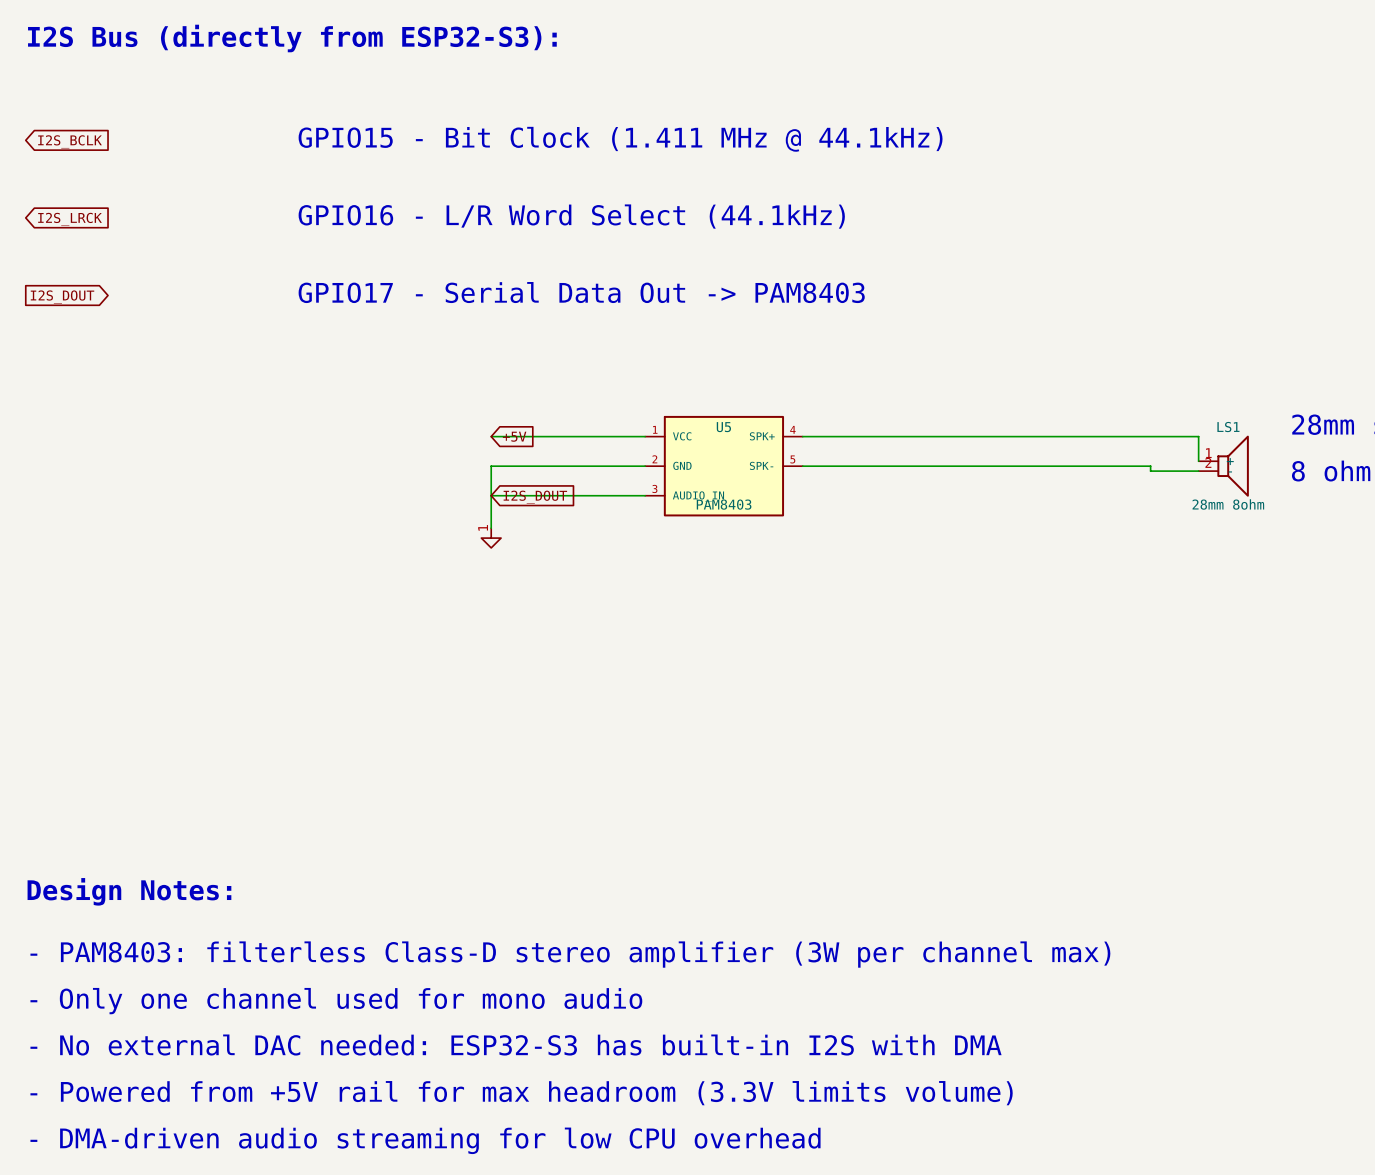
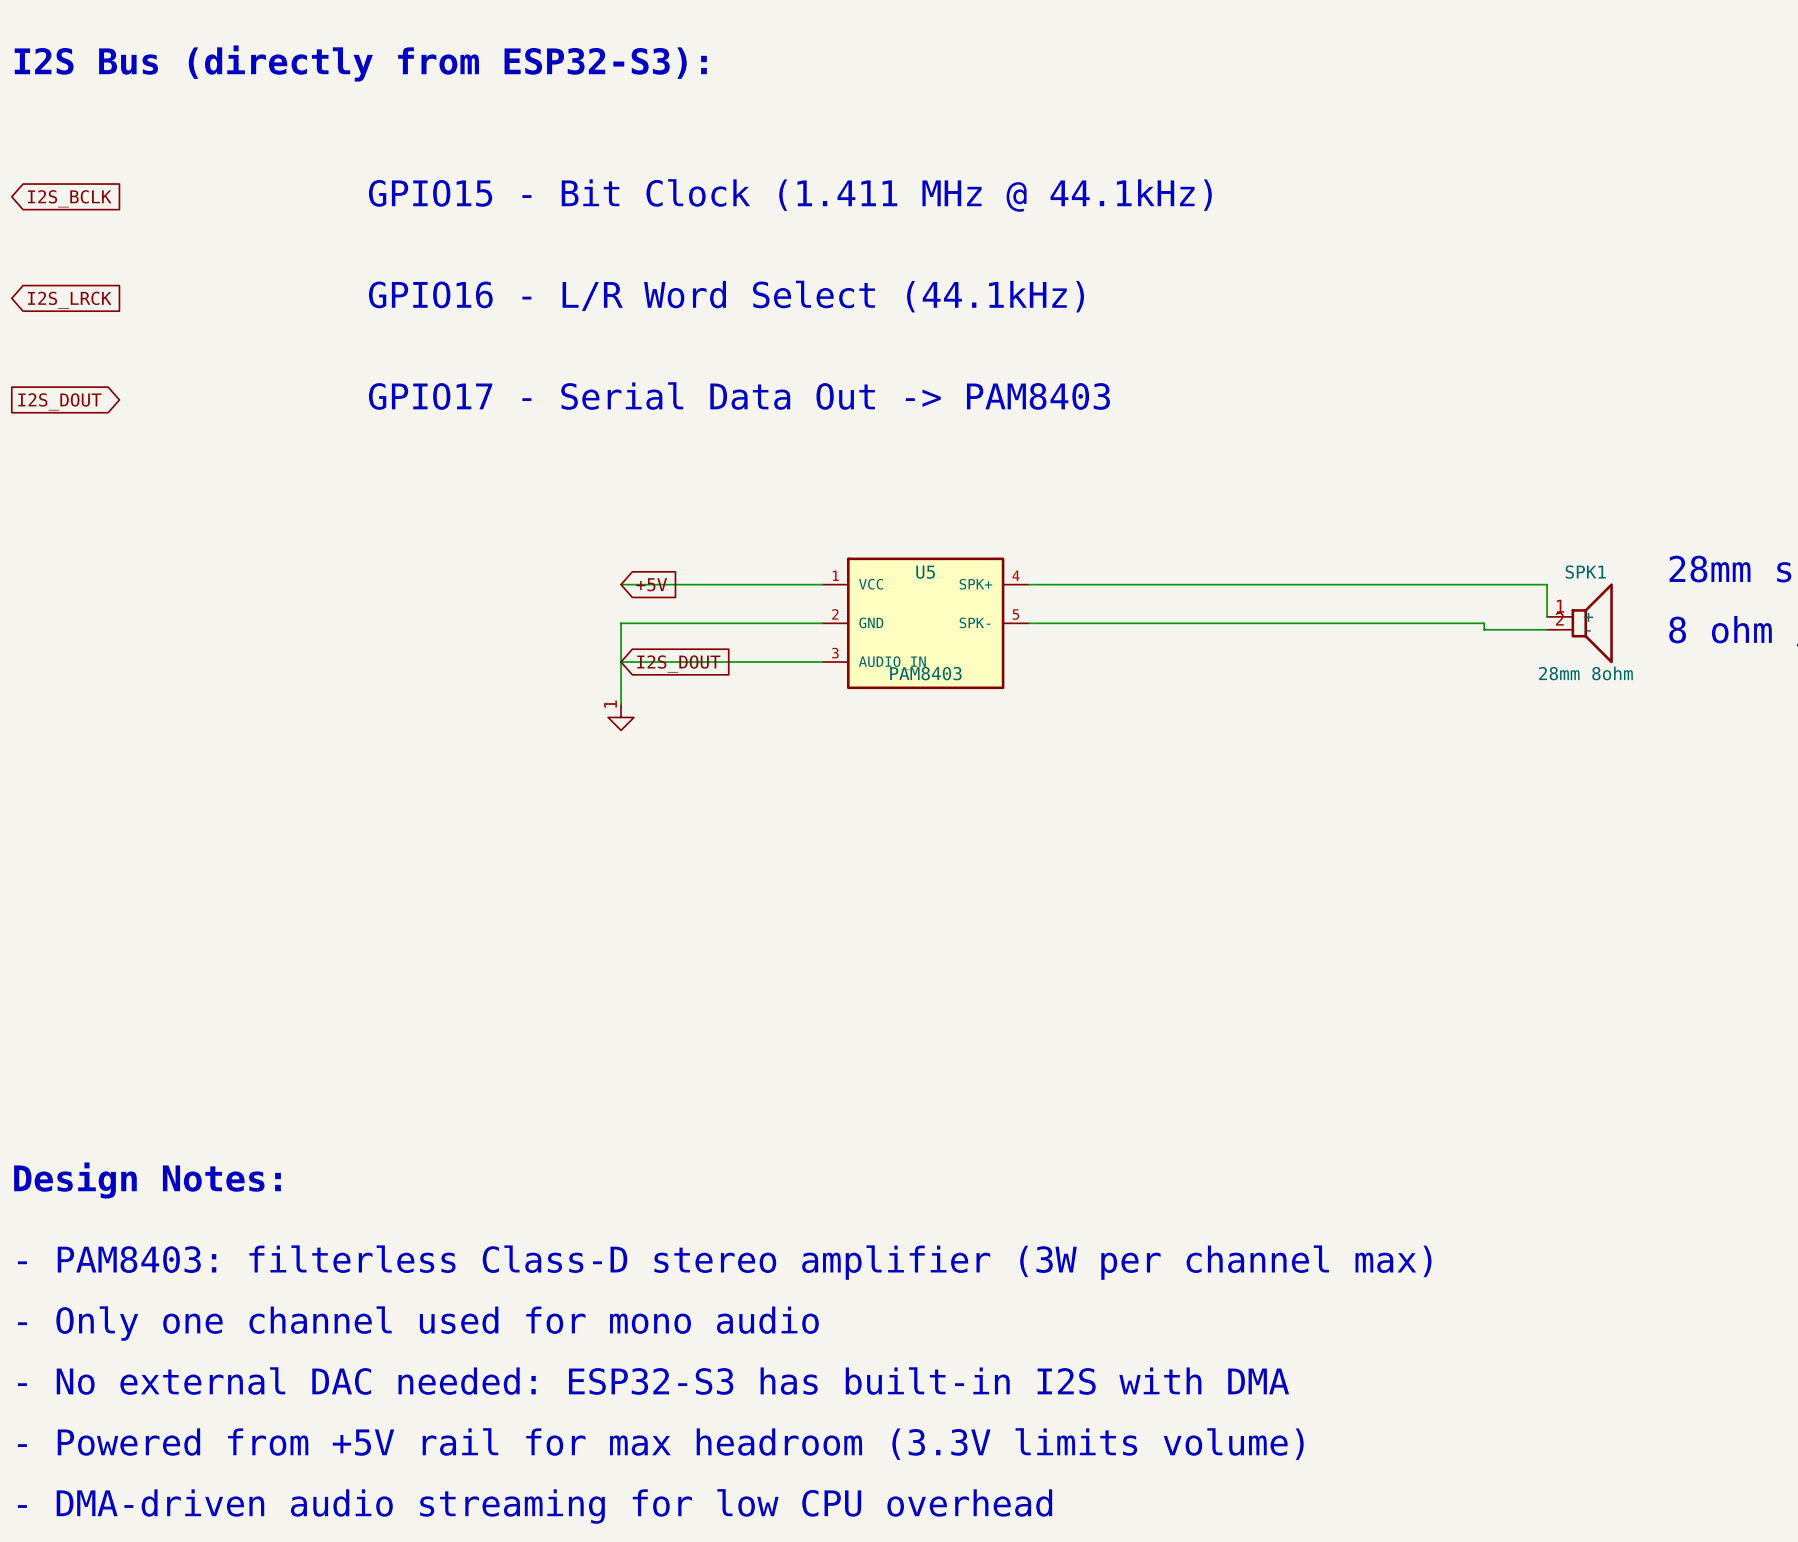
LS1 name: LS1 (1228, 427) -> SPK1 (1585, 572)

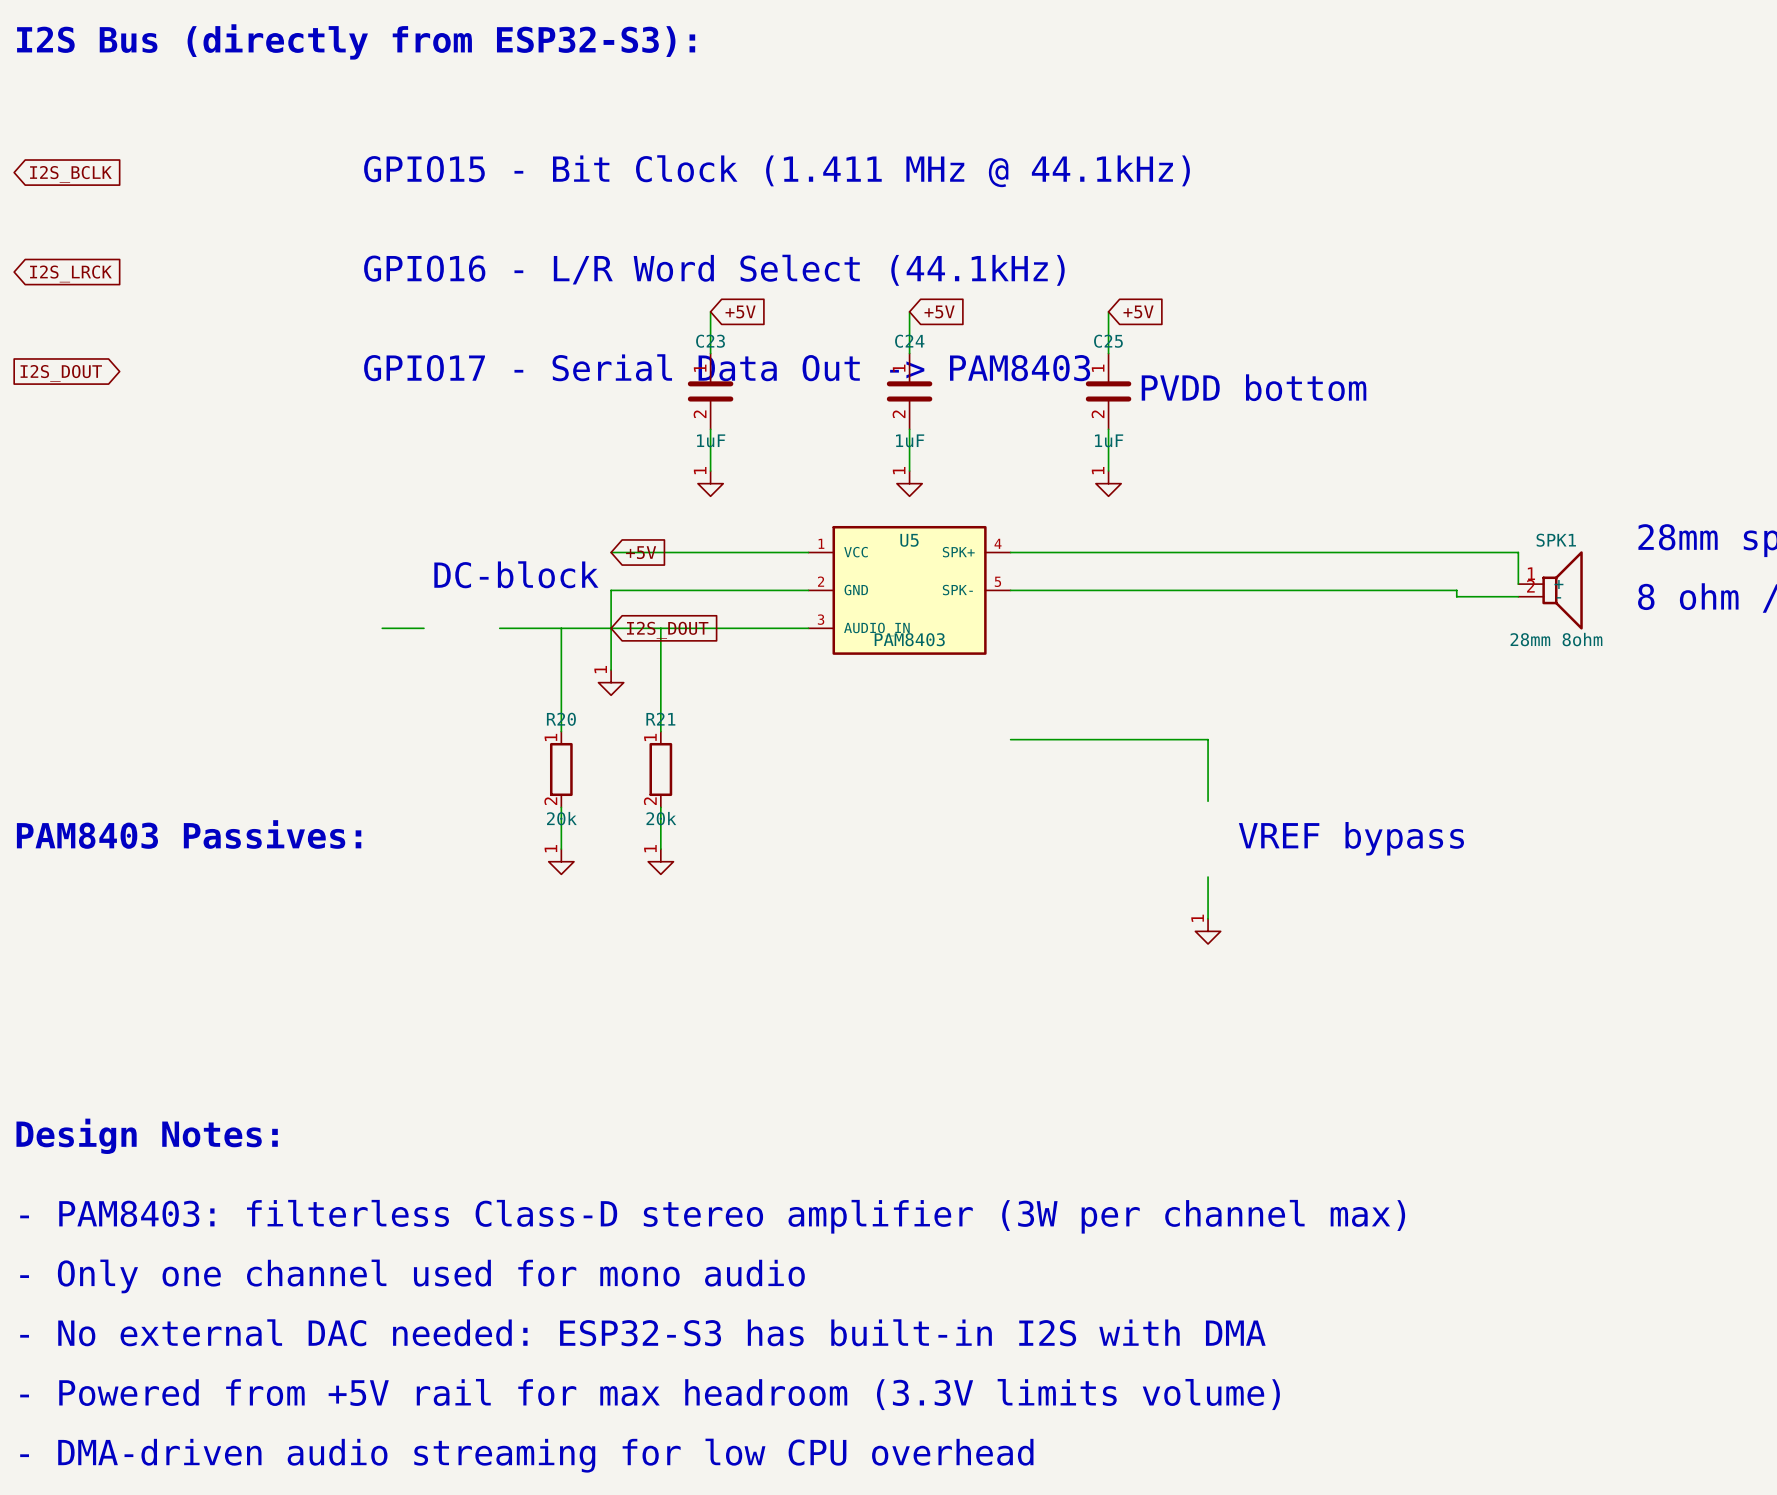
wire: none -> (710, 311) (710, 353)
global label: none -> +5V (740, 311)
wire: none -> (909, 311) (909, 353)
global label: none -> +5V (939, 311)
wire: none -> (1108, 311) (1108, 353)
global label: none -> +5V (1138, 311)
text: none -> PVDD bottom (1254, 387)
C23: none -> 1uF (710, 391)
C24: none -> 1uF (909, 391)
C25: none -> 1uF (1108, 391)
wire: none -> (710, 429) (710, 471)
wire: none -> (909, 429) (909, 471)
wire: none -> (1108, 429) (1108, 471)
power symbol: none -> (710, 483)
power symbol: none -> (909, 483)
power symbol: none -> (1108, 483)
text: none -> DC-block (516, 574)
wire: none -> (382, 628) (423, 628)
wire: none -> (499, 628) (611, 628)
wire: none -> (561, 628) (561, 731)
wire: none -> (660, 628) (660, 731)
wire: none -> (1010, 739) (1208, 739) (1208, 801)
R20: none -> 20k (561, 769)
R21: none -> 20k (660, 769)
wire: none -> (561, 807) (561, 849)
wire: none -> (660, 807) (660, 849)
text: none -> PAM8403 Passives: (189, 834)
text: none -> VREF bypass (1351, 838)
power symbol: none -> (561, 861)
power symbol: none -> (660, 861)
wire: none -> (1208, 877) (1208, 918)
power symbol: none -> (1208, 931)

